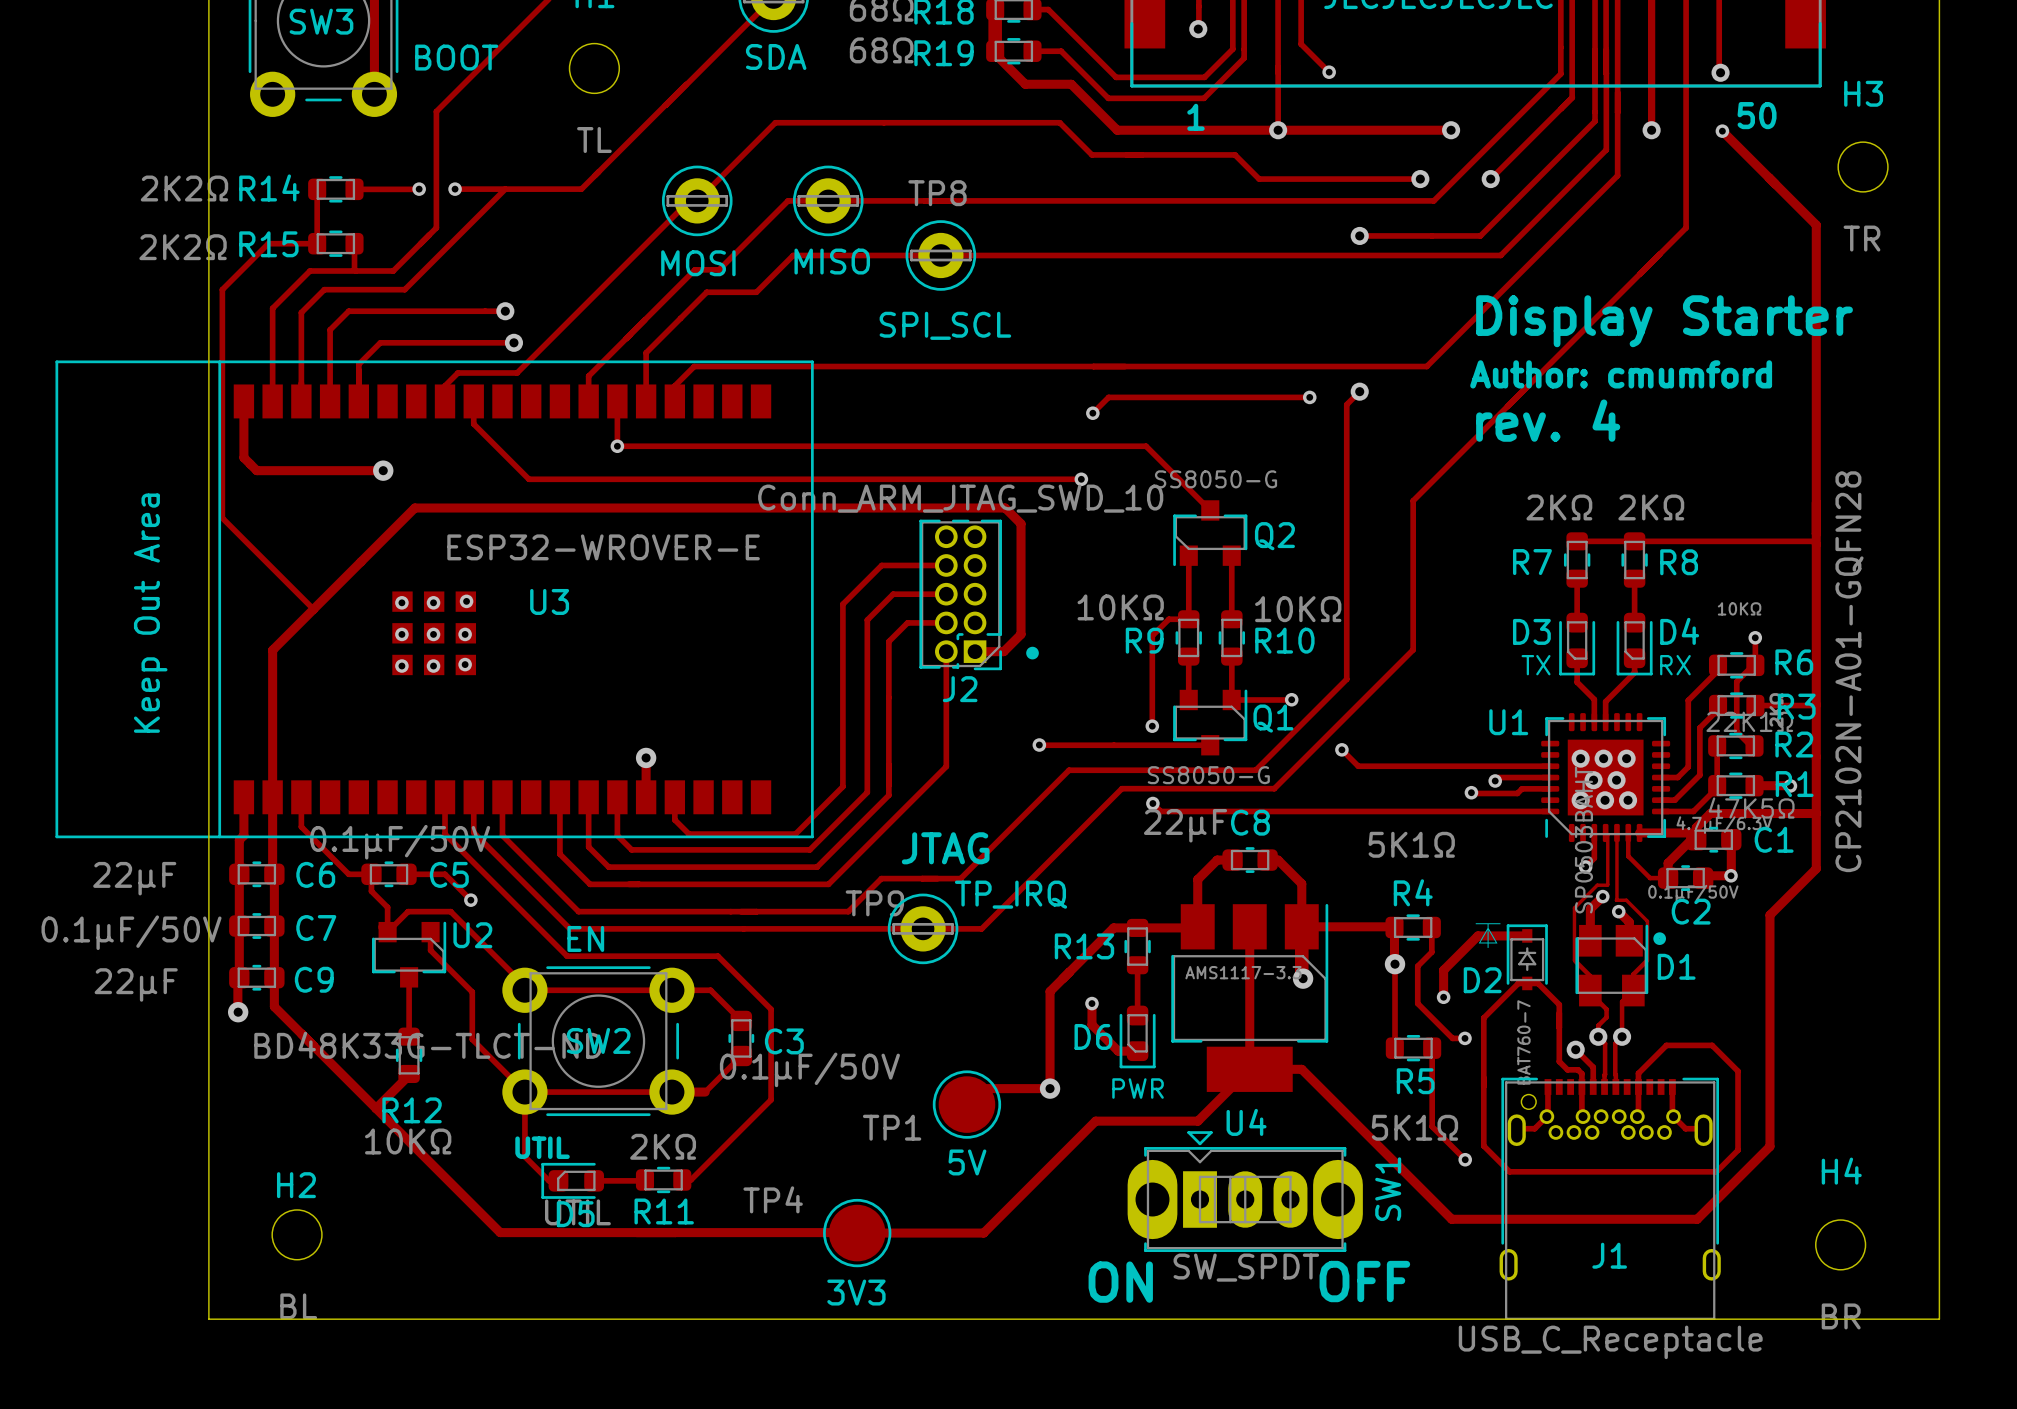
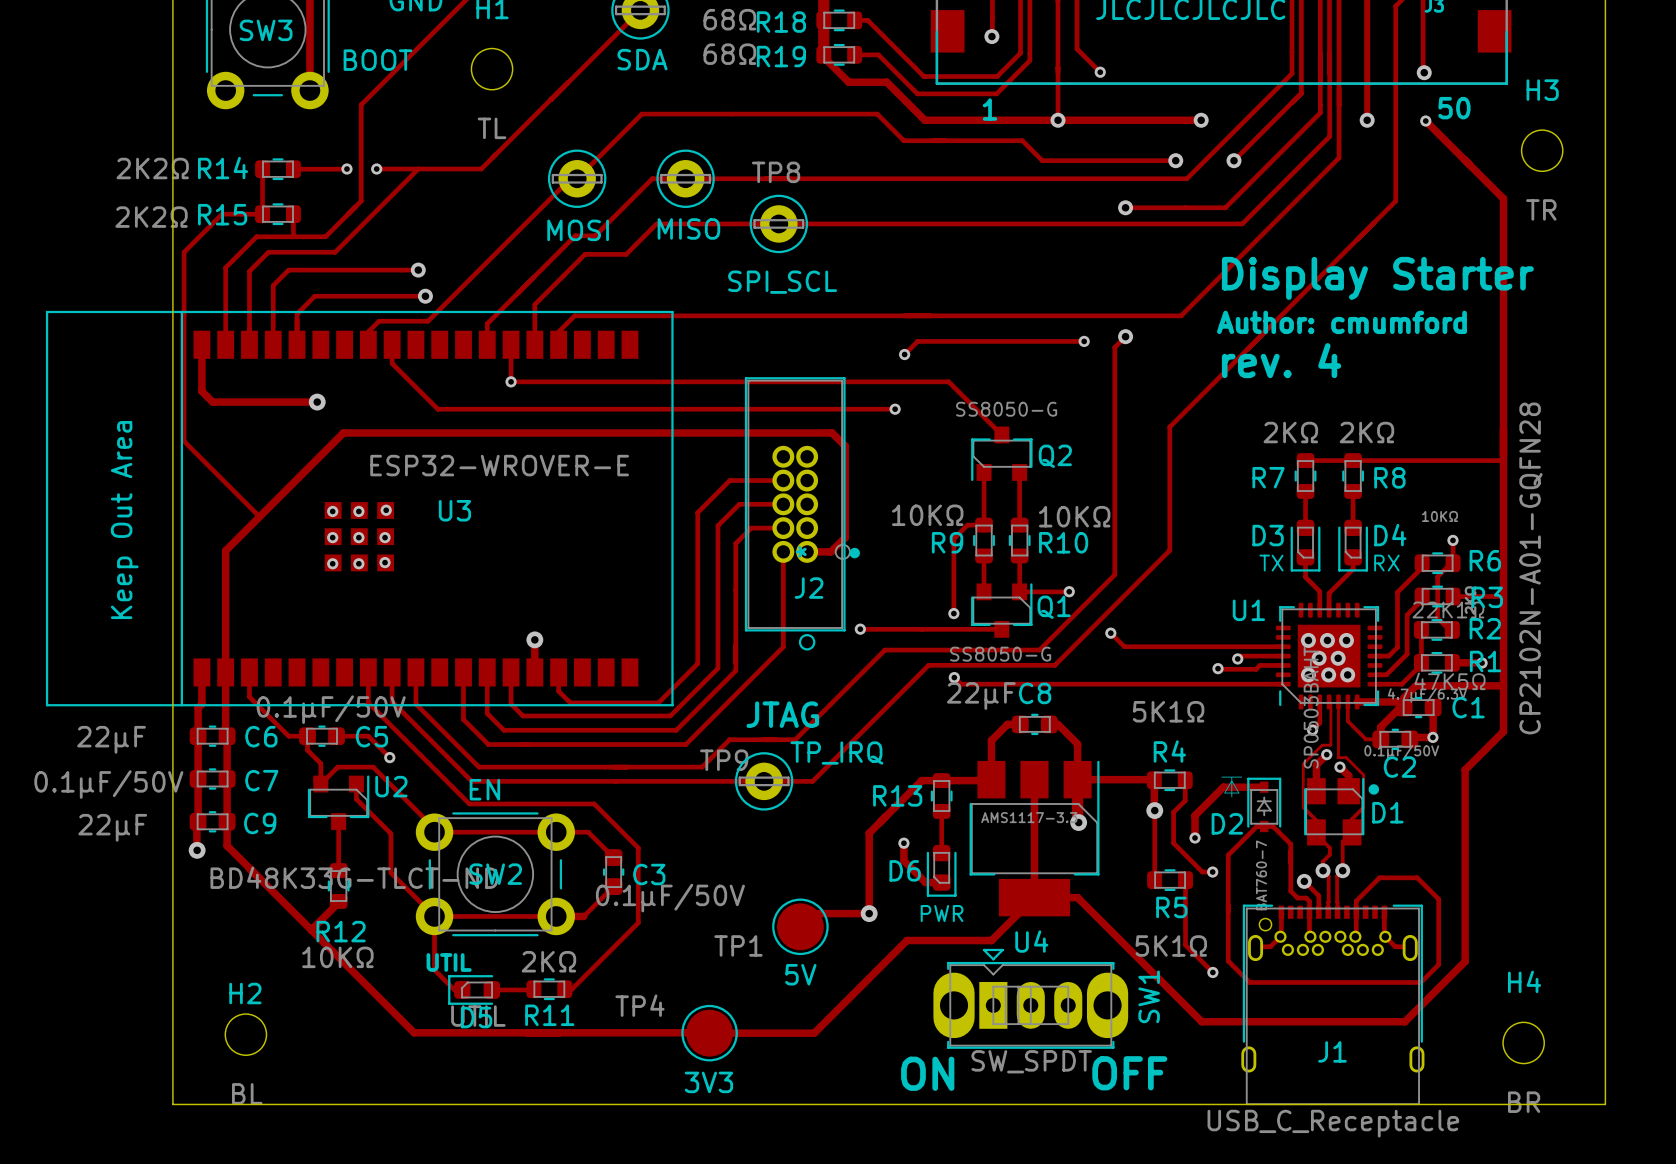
J2 value: Conn_ARM_JTAG_SWD_10 (960, 498) -> none
J2 footprint: [919, 519, 1002, 671] -> [744, 377, 851, 651]

